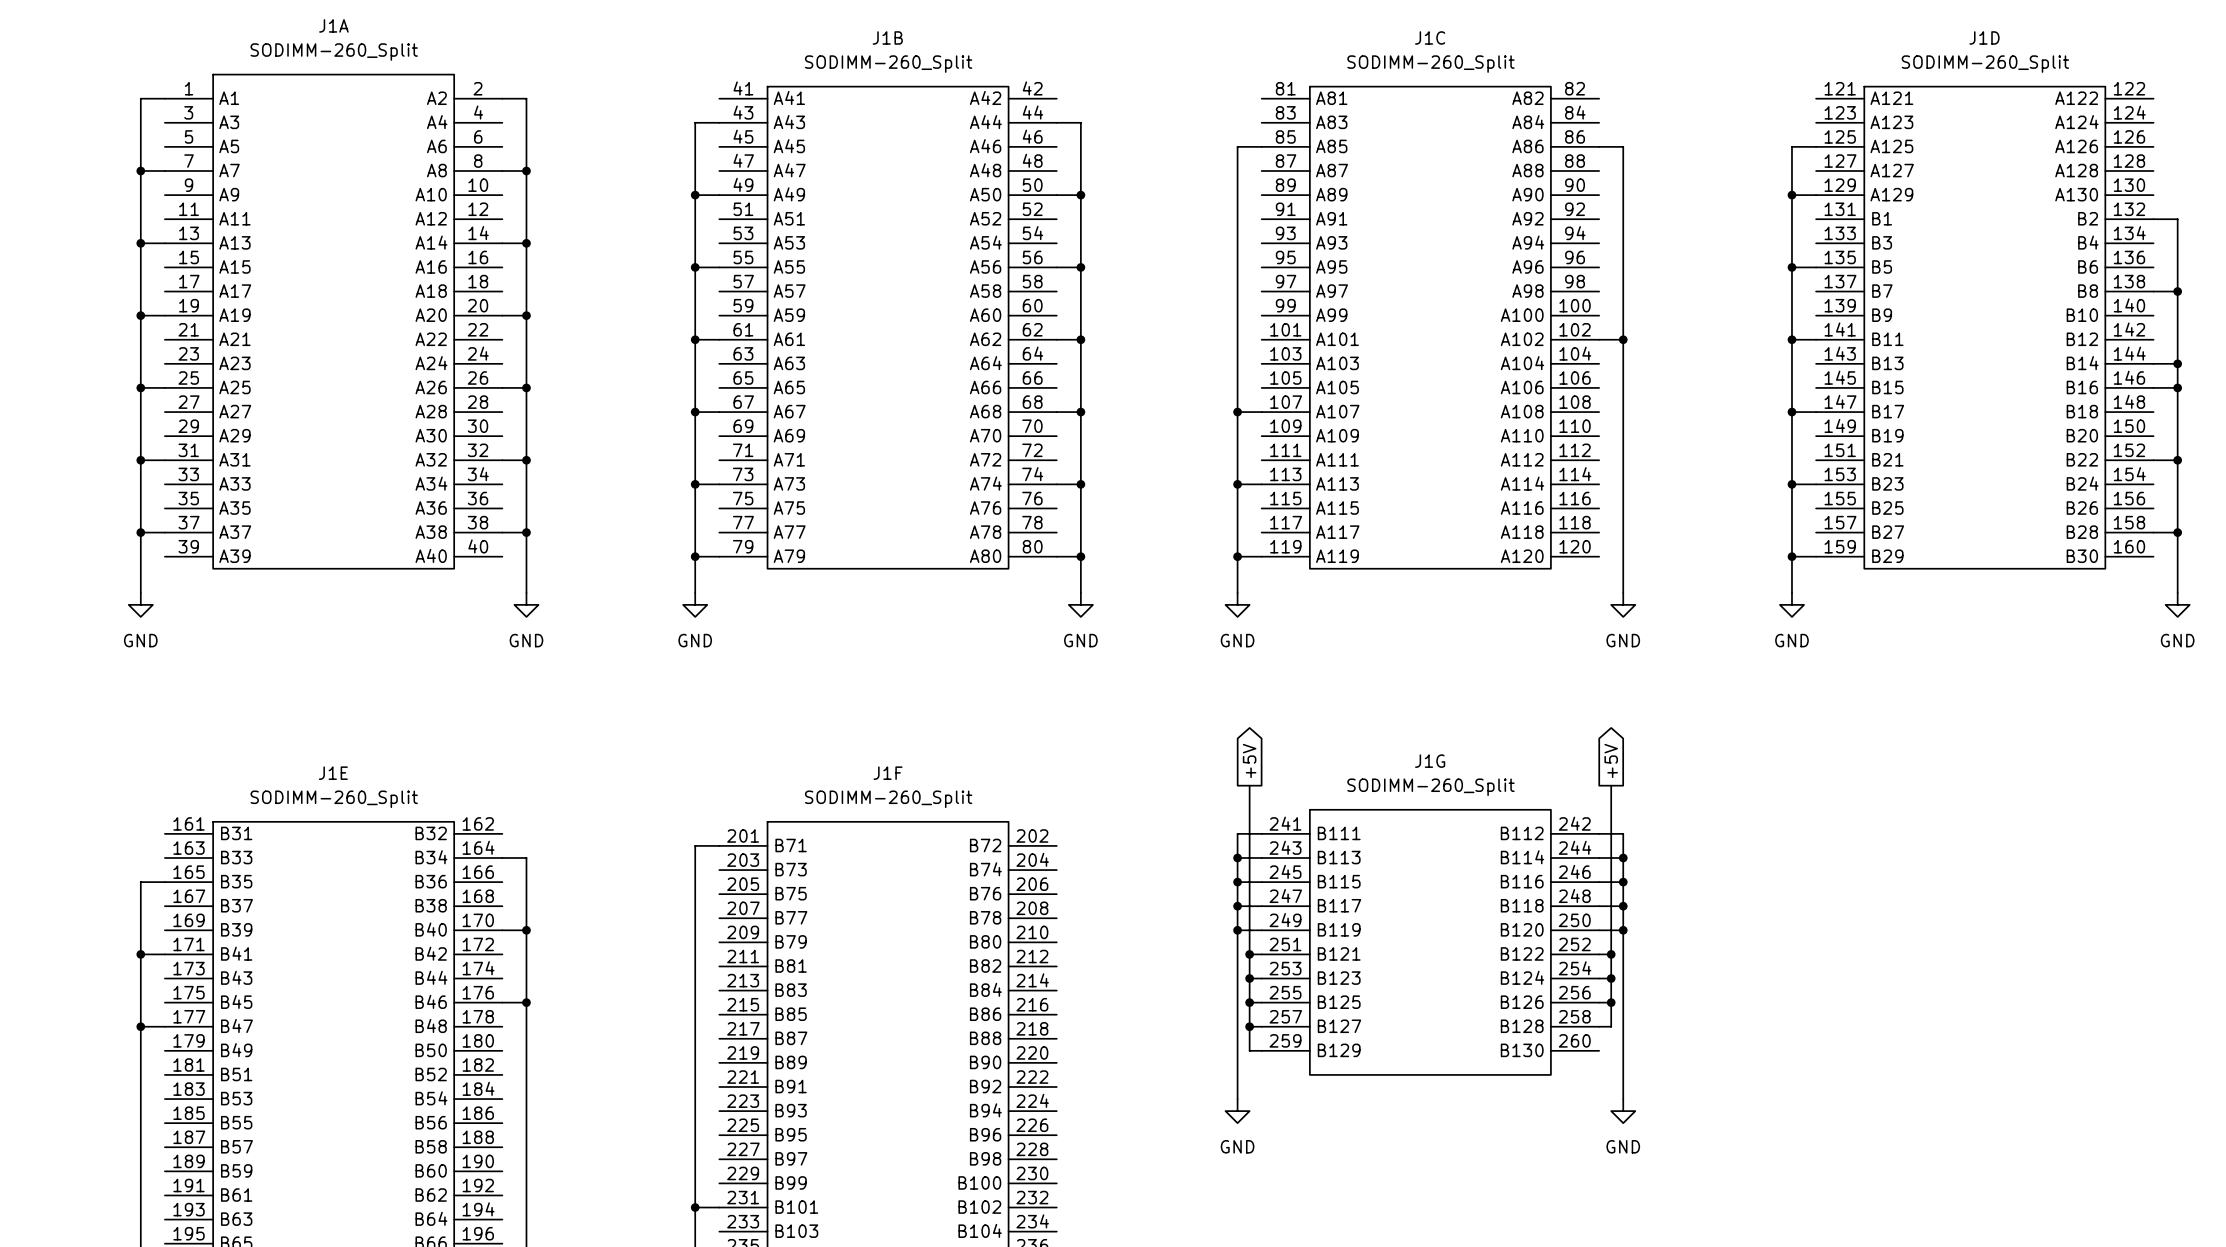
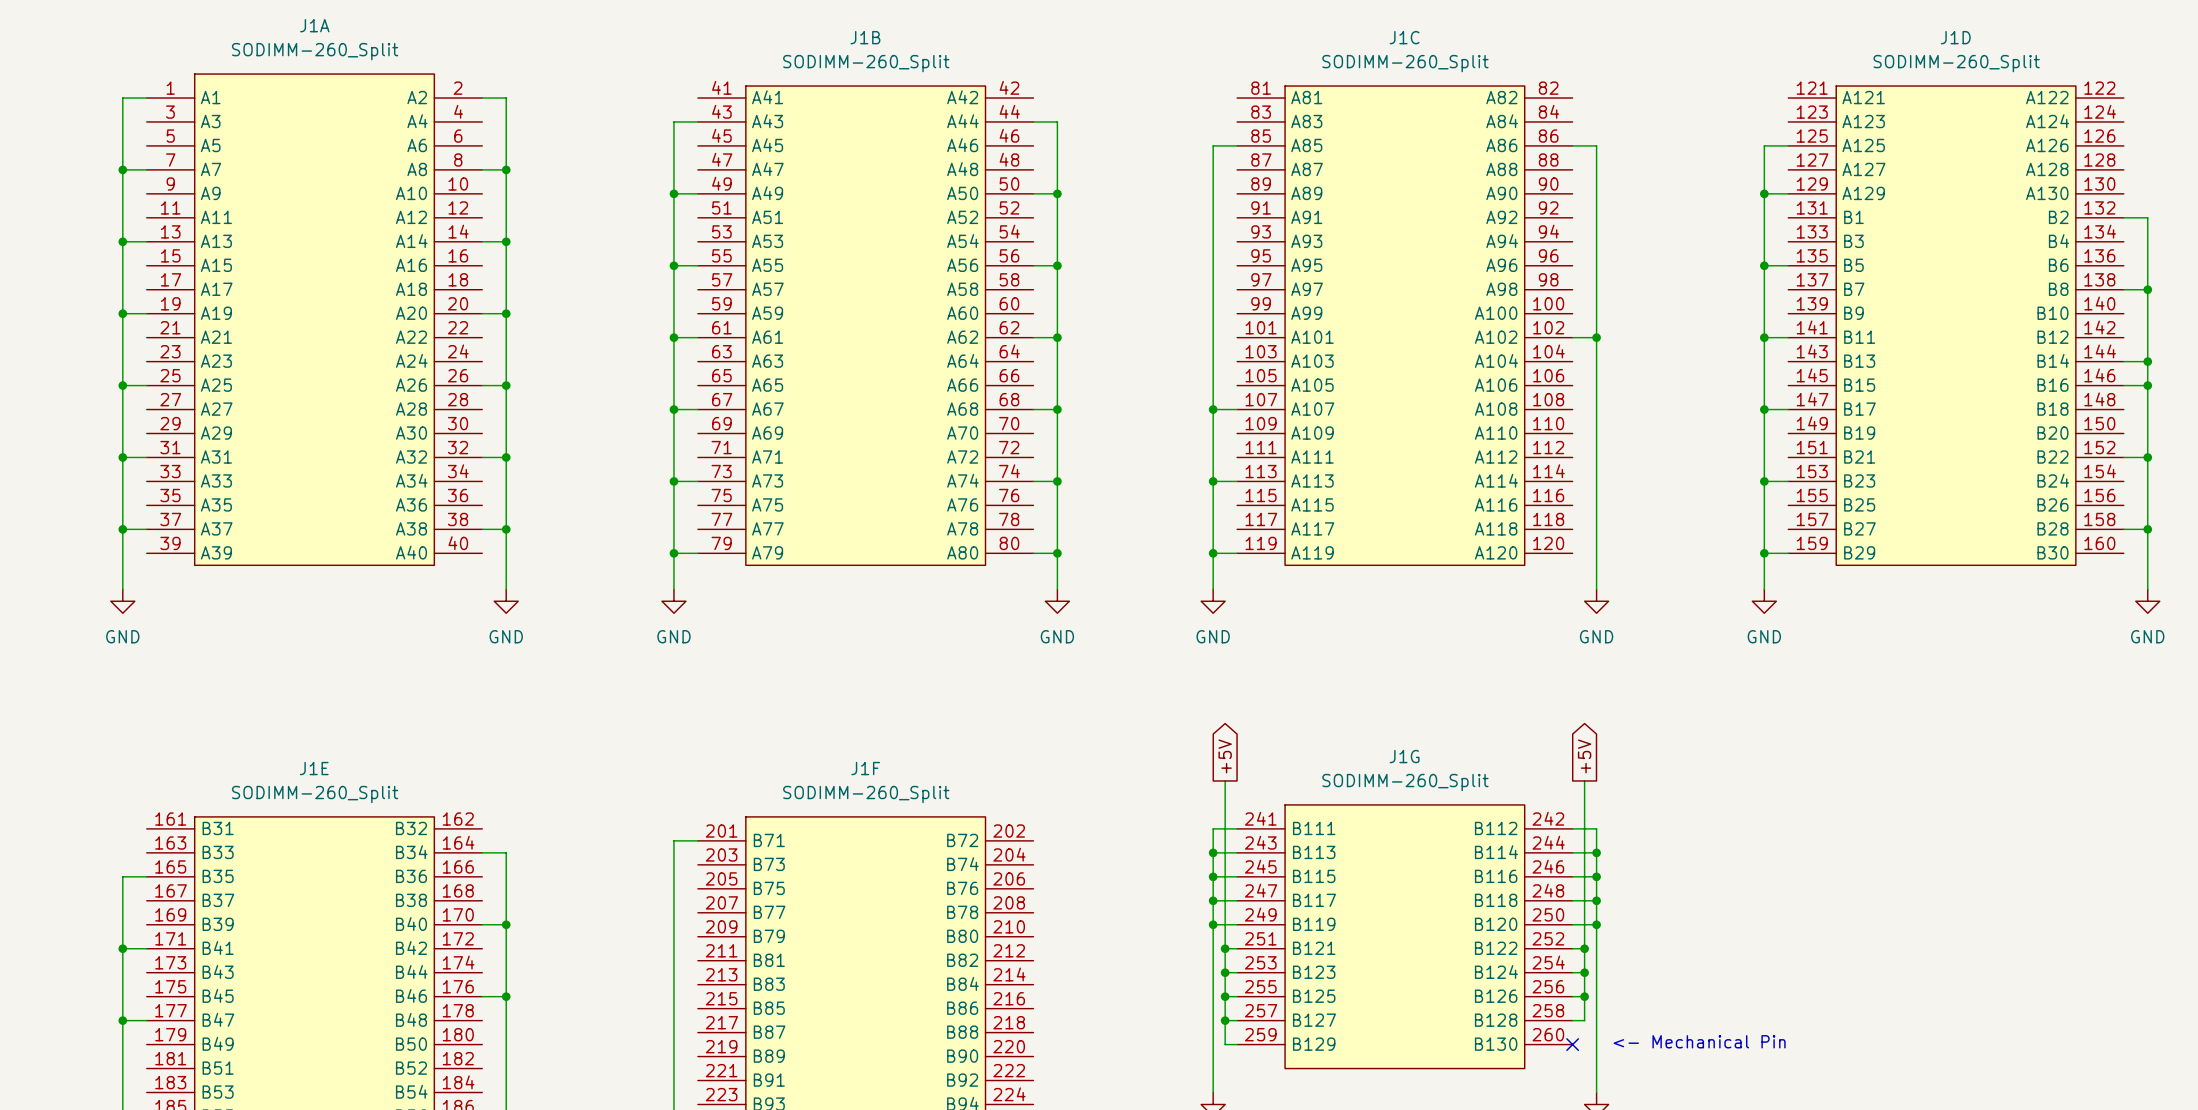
text: none -> <- Mechanical Pin (1699, 1041)
no-connect mark: none -> (1572, 1044)

